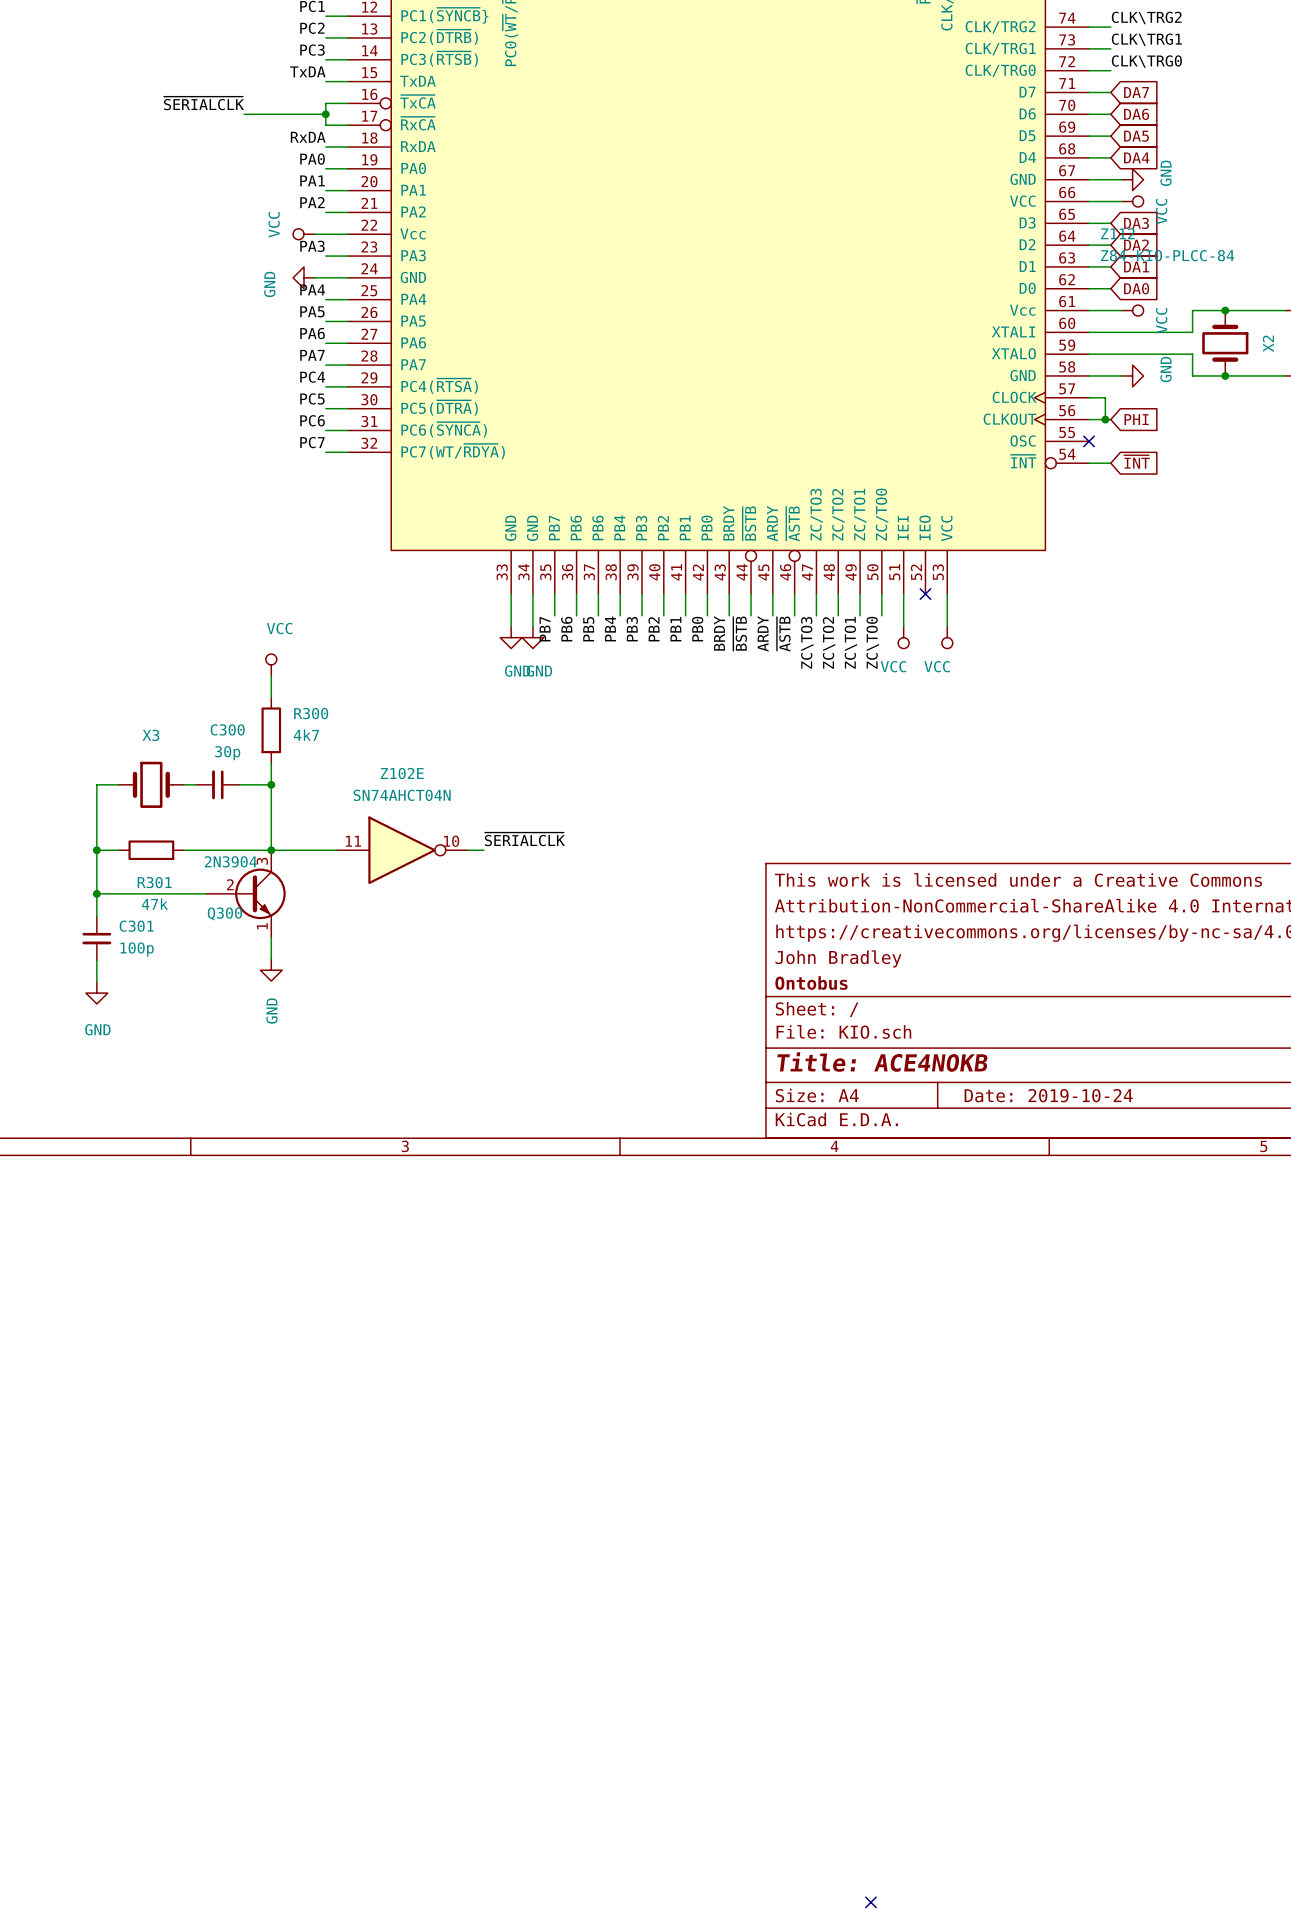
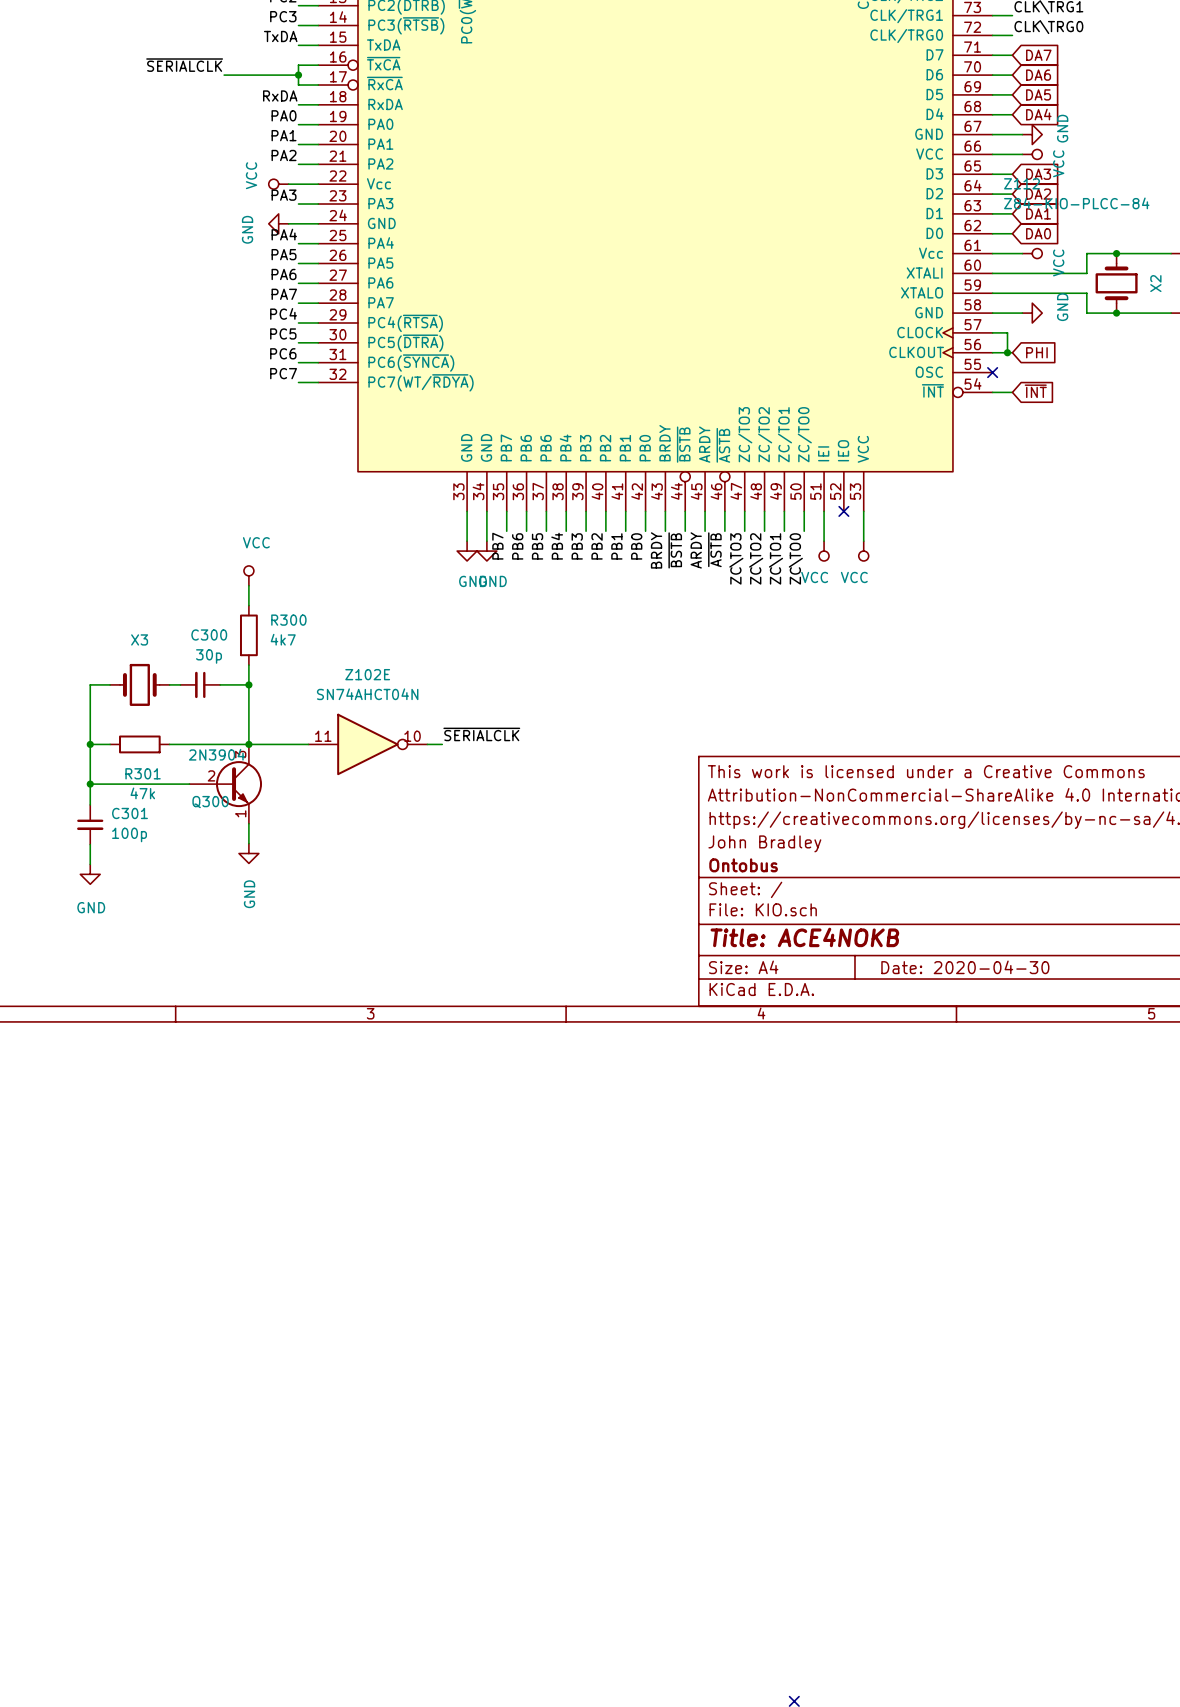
title block: Date: 2019-10-24 (1048, 1095) -> Date: 2020-04-30 (965, 967)

